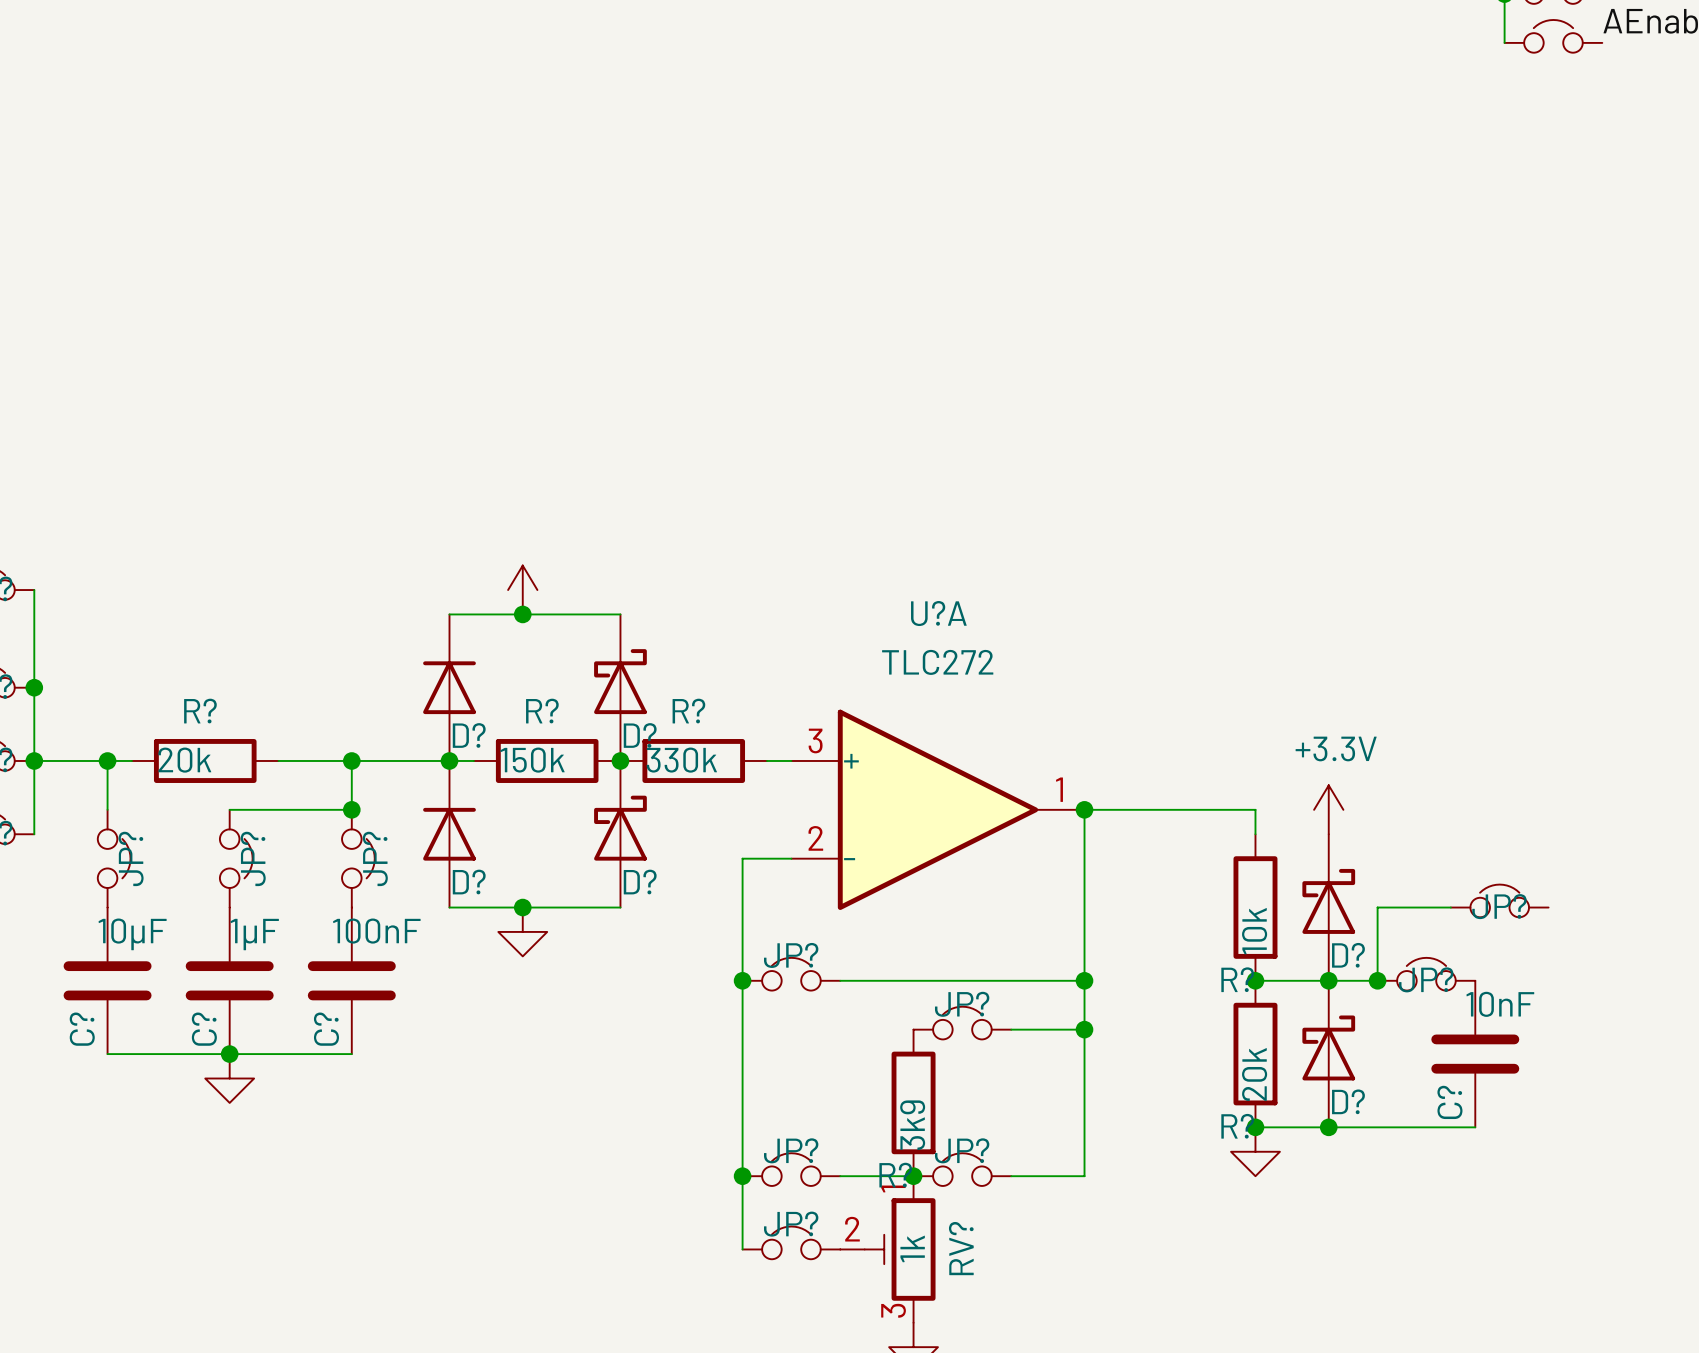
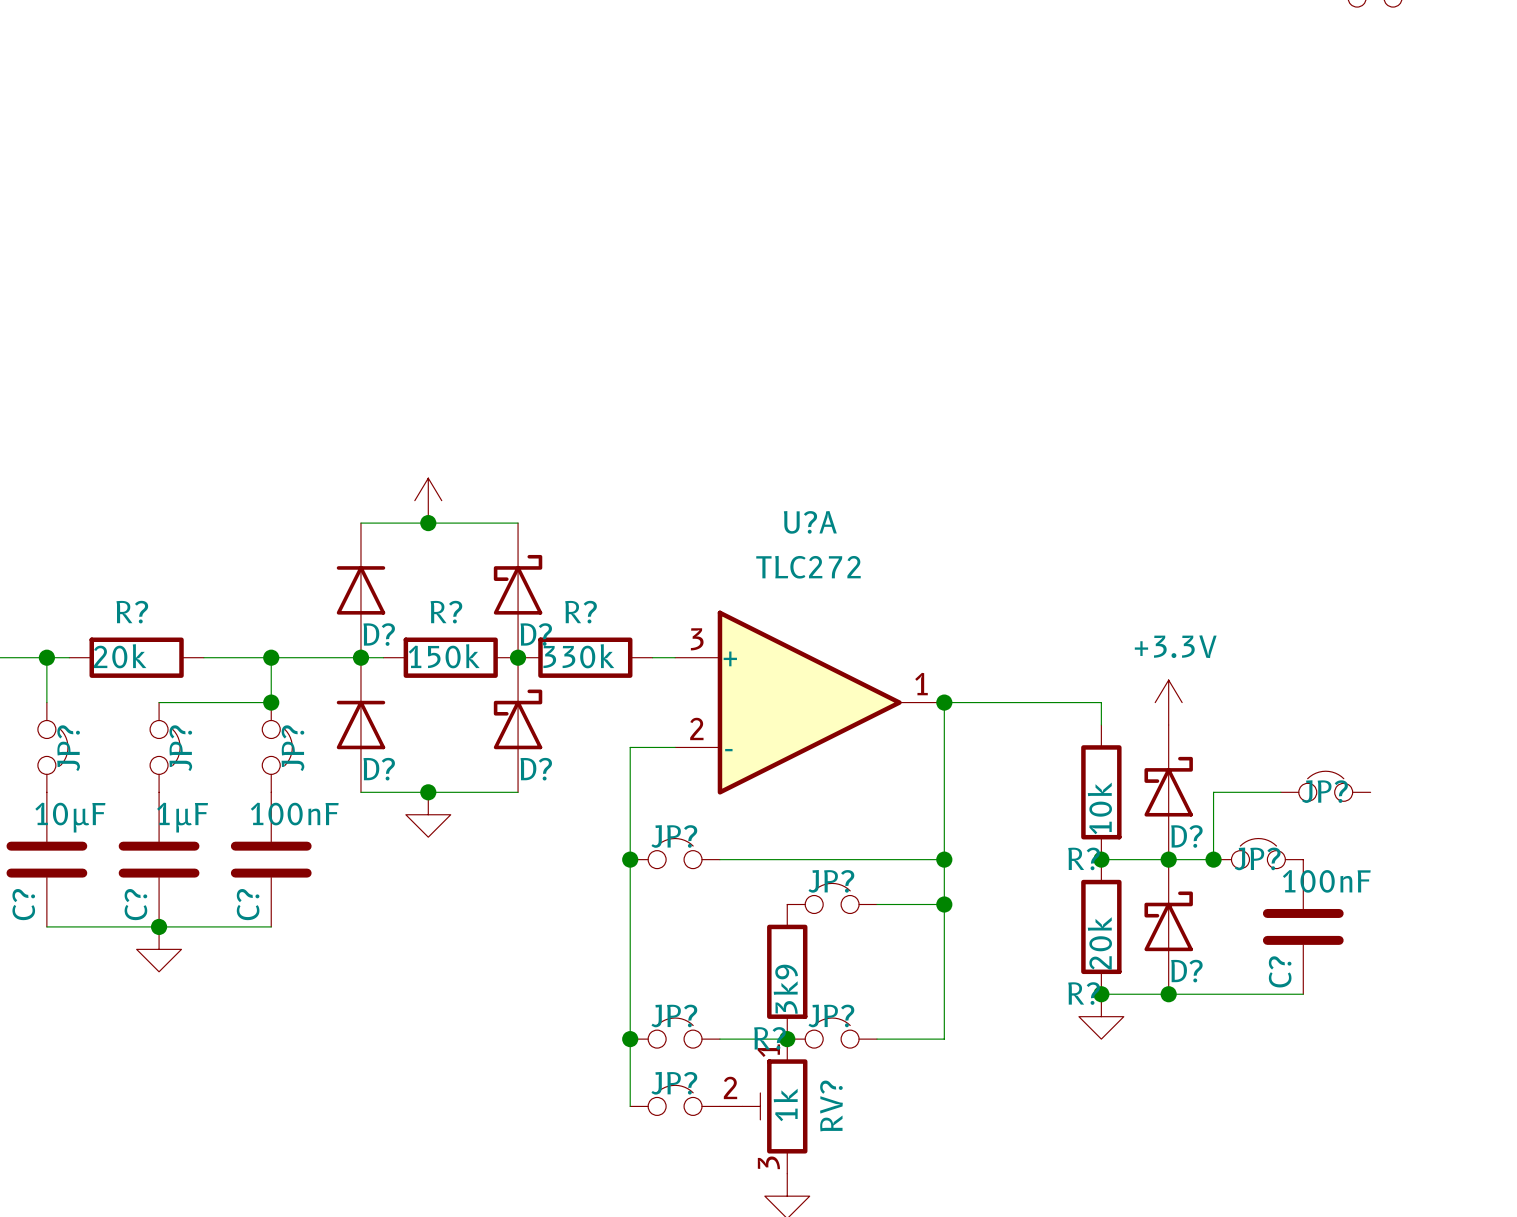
C? value: 10nF (1500, 1004) -> 100nF (1326, 881)

